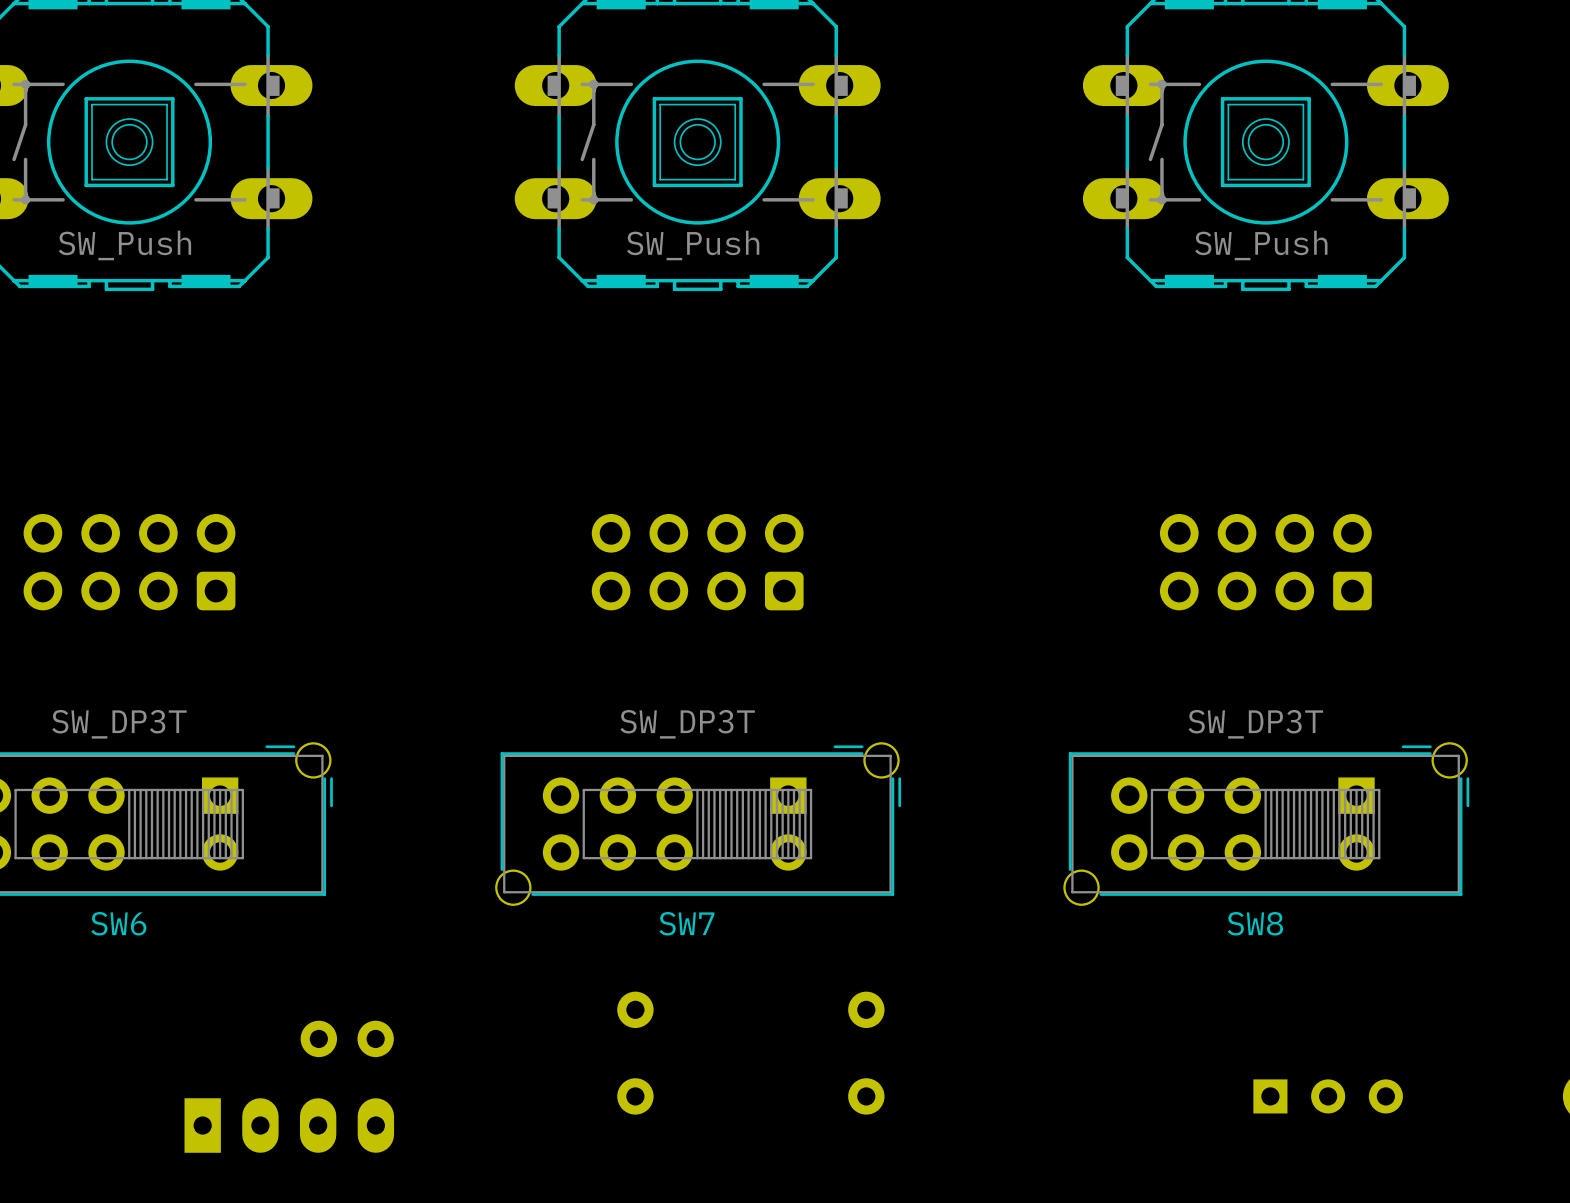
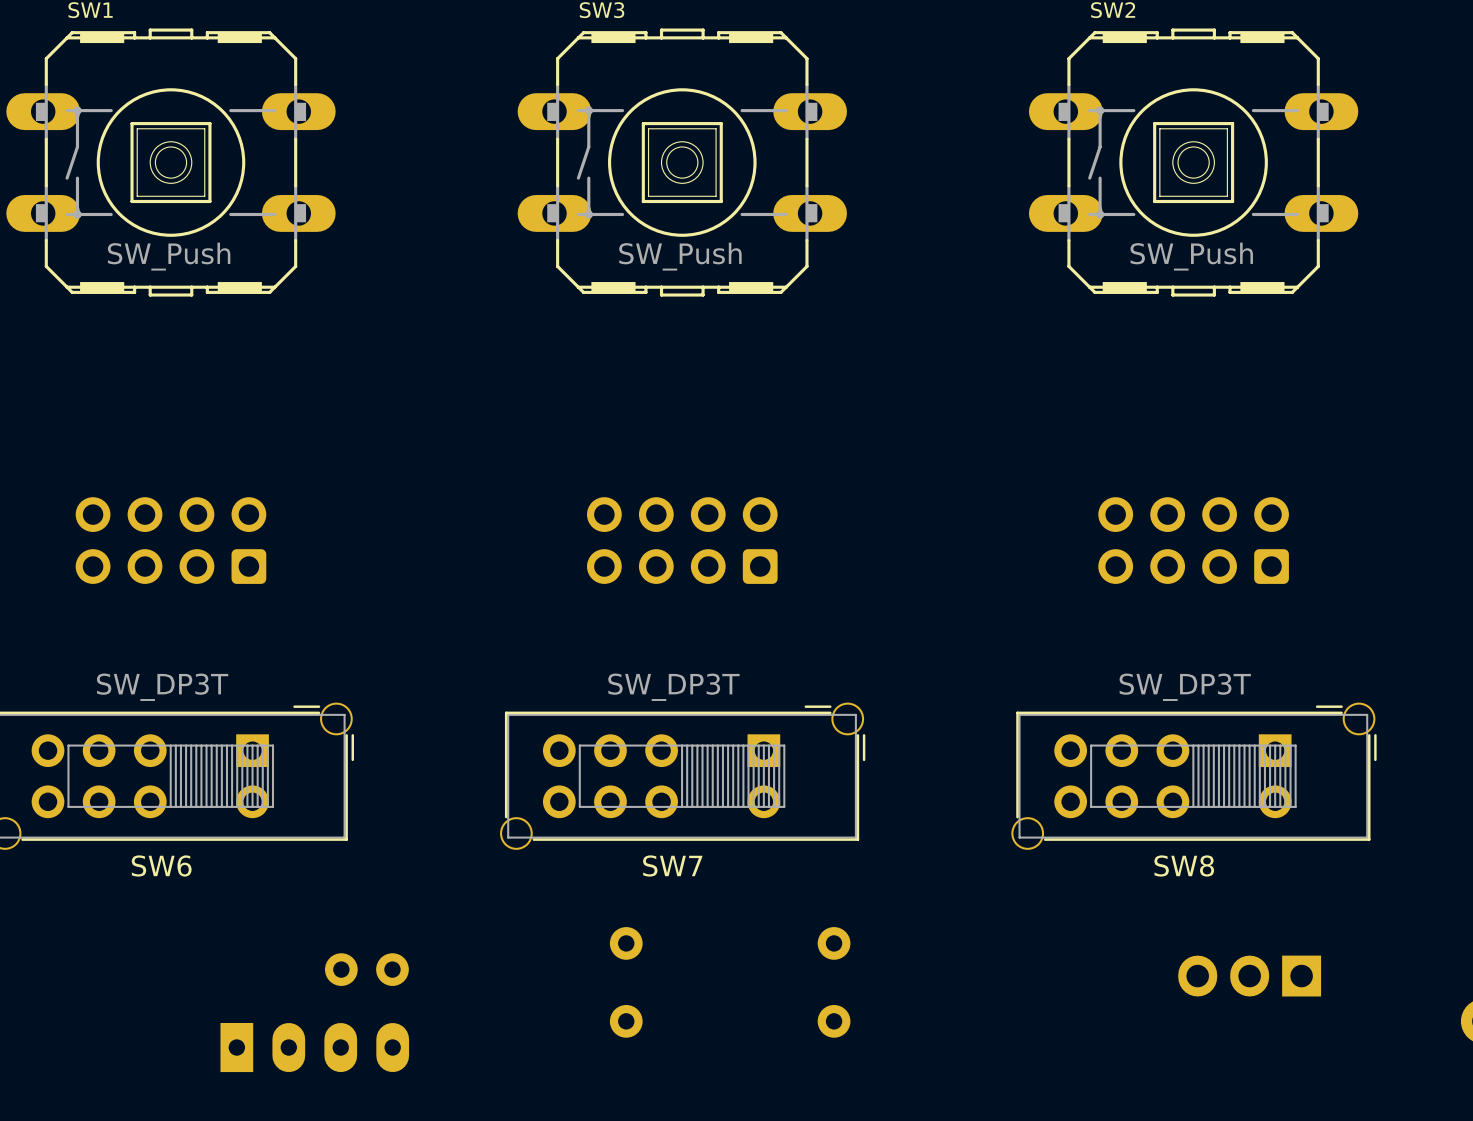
part: none -> (1249, 976)
part: (1328, 1096) -> none

